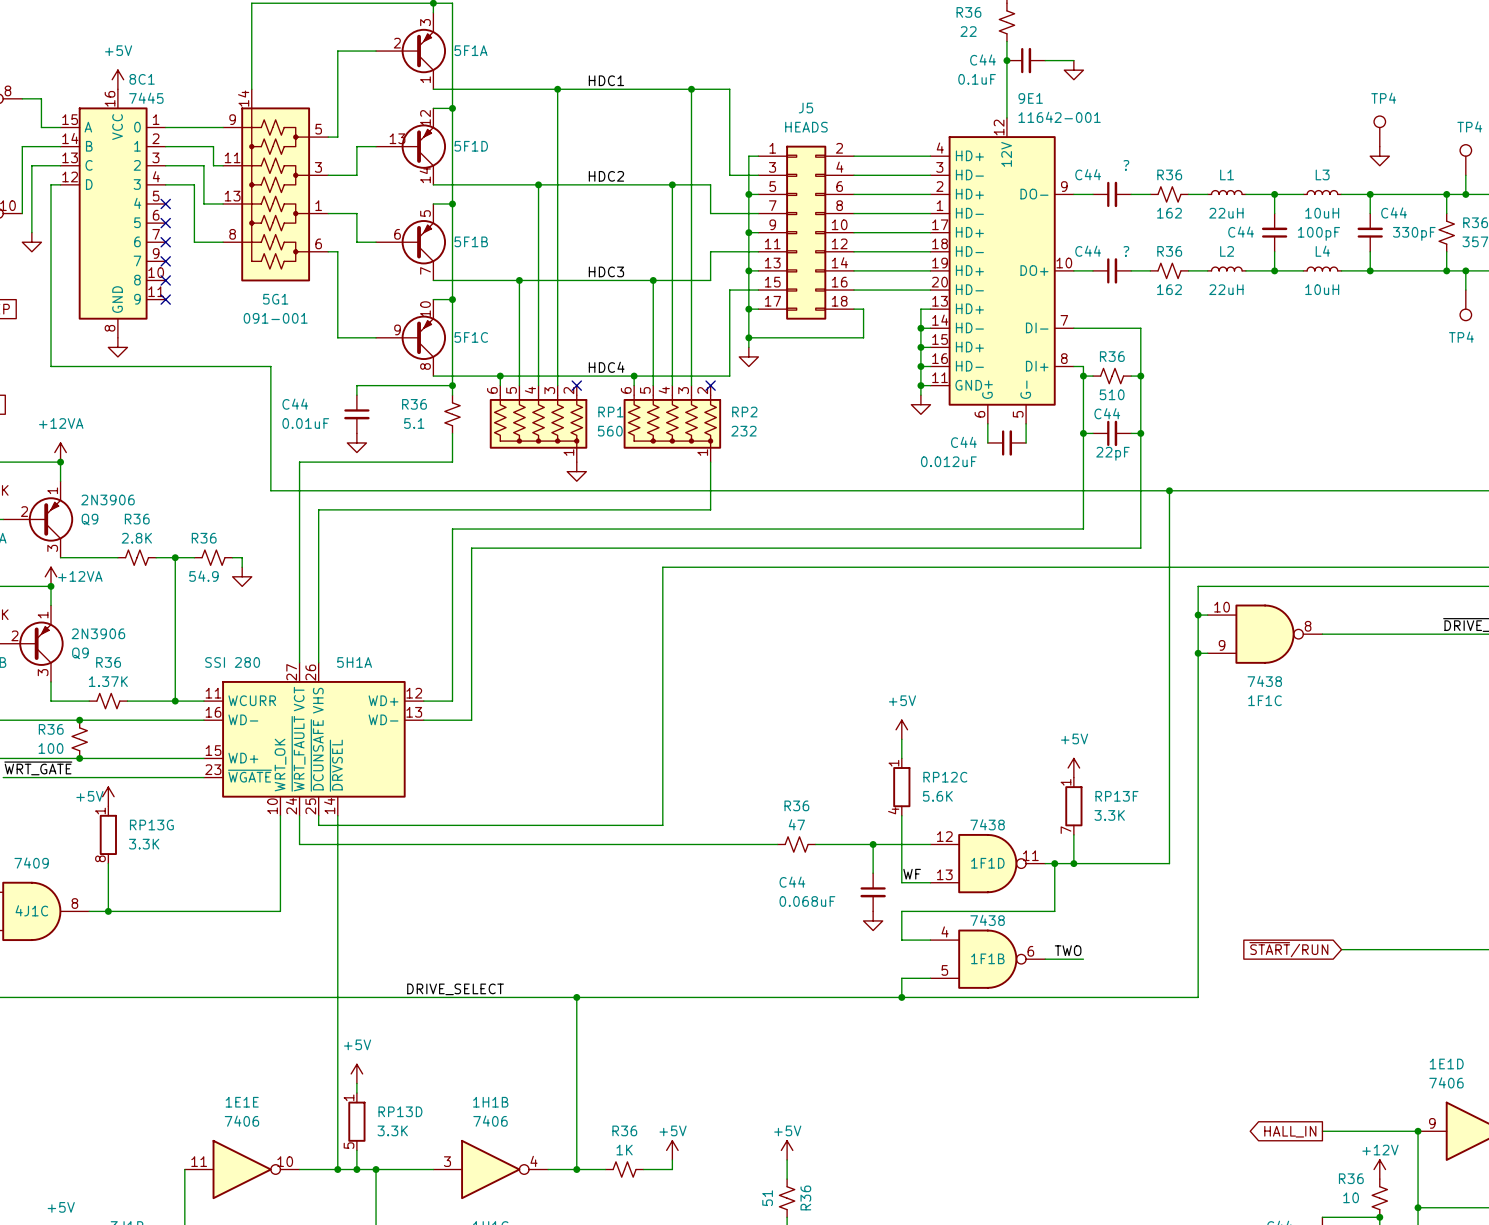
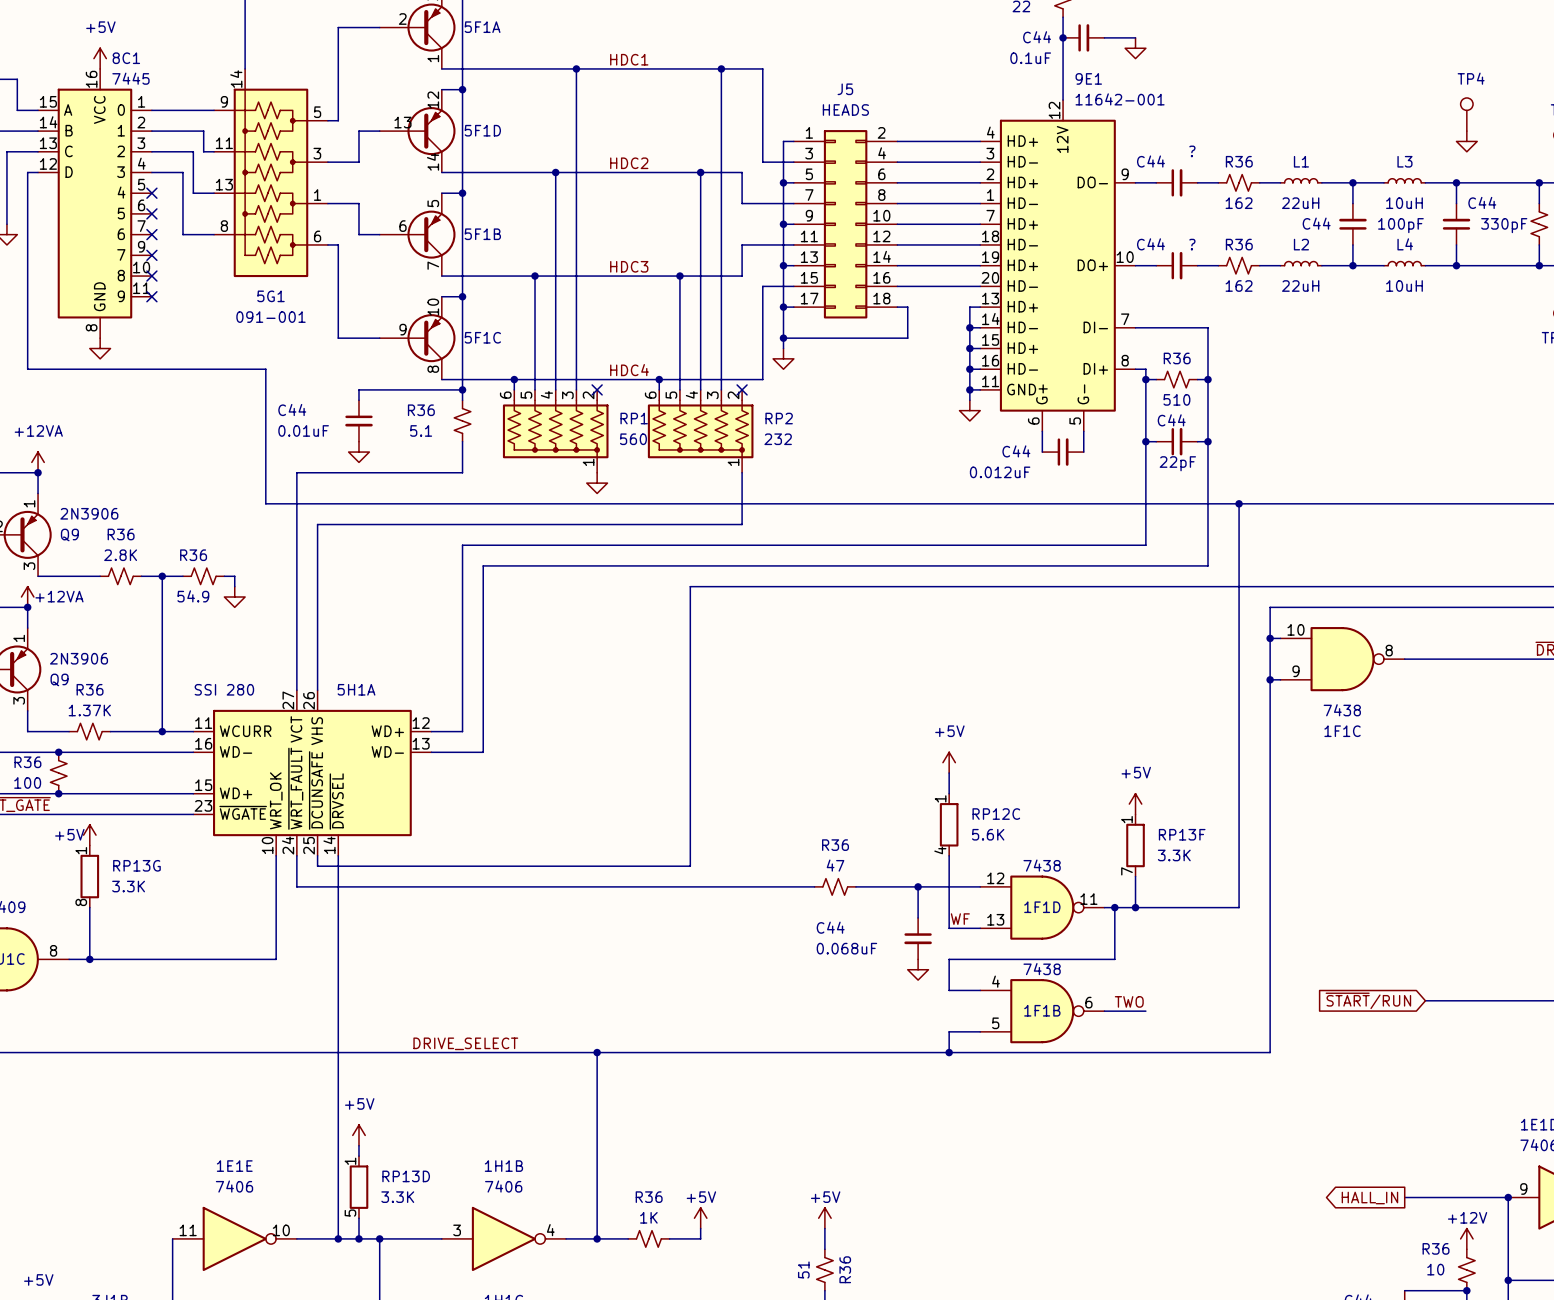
9E1 pin number: 17 (940, 224) -> 7 (990, 215)

